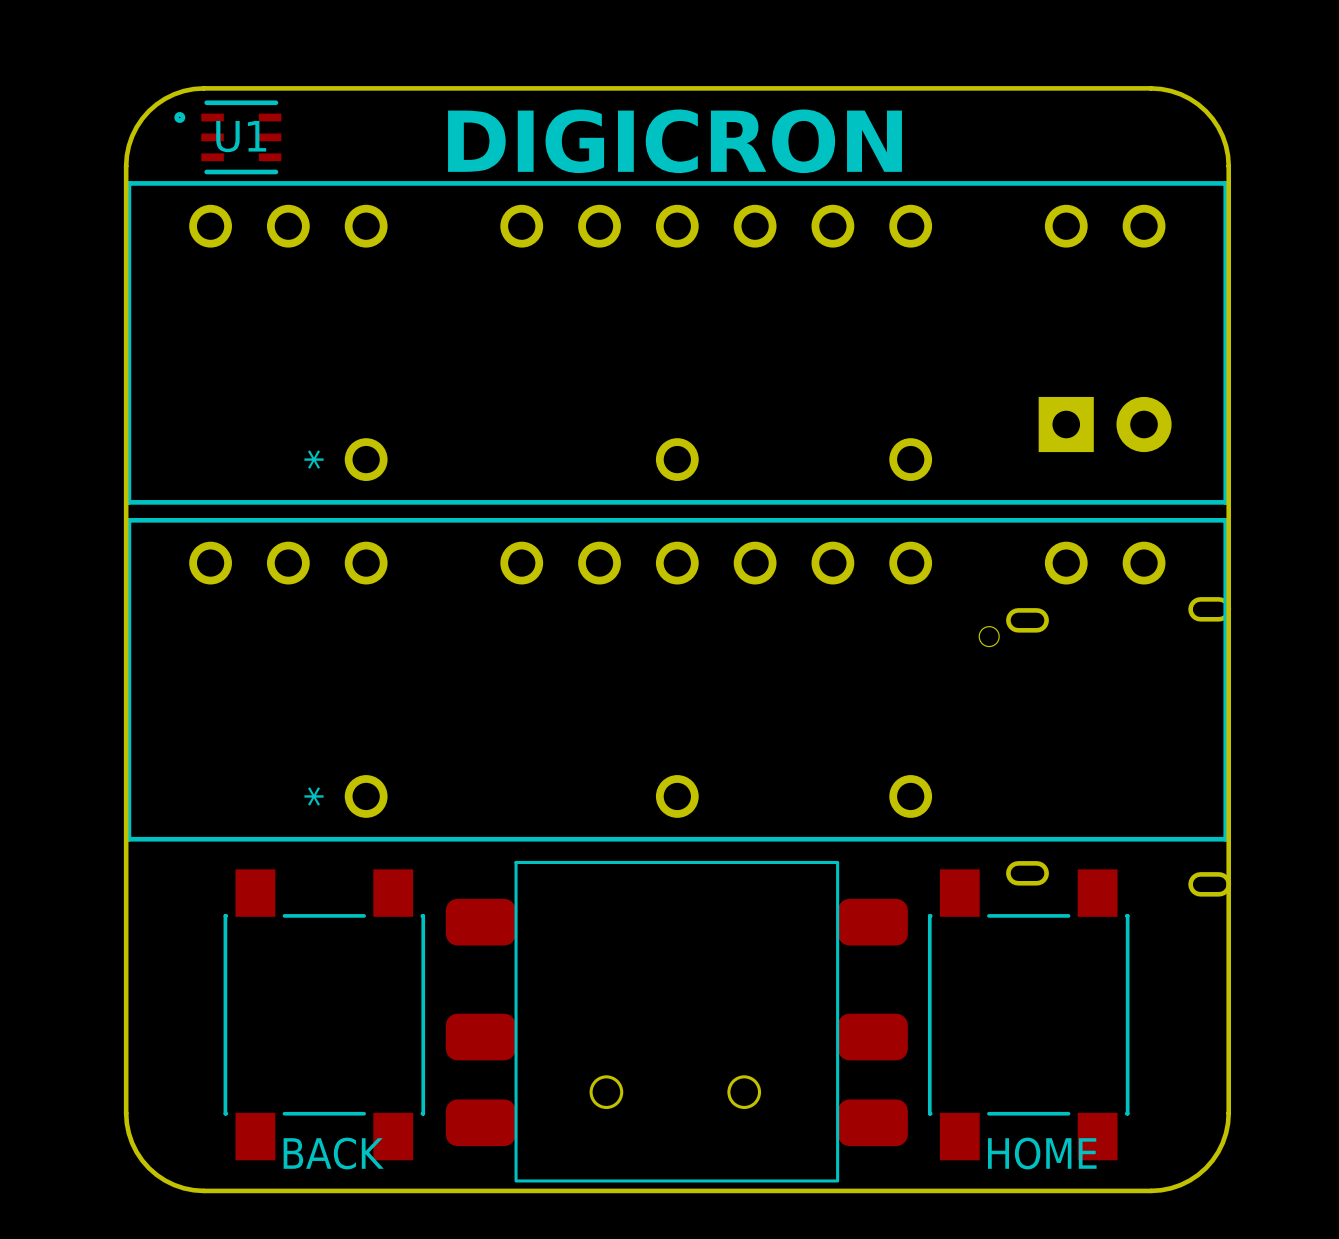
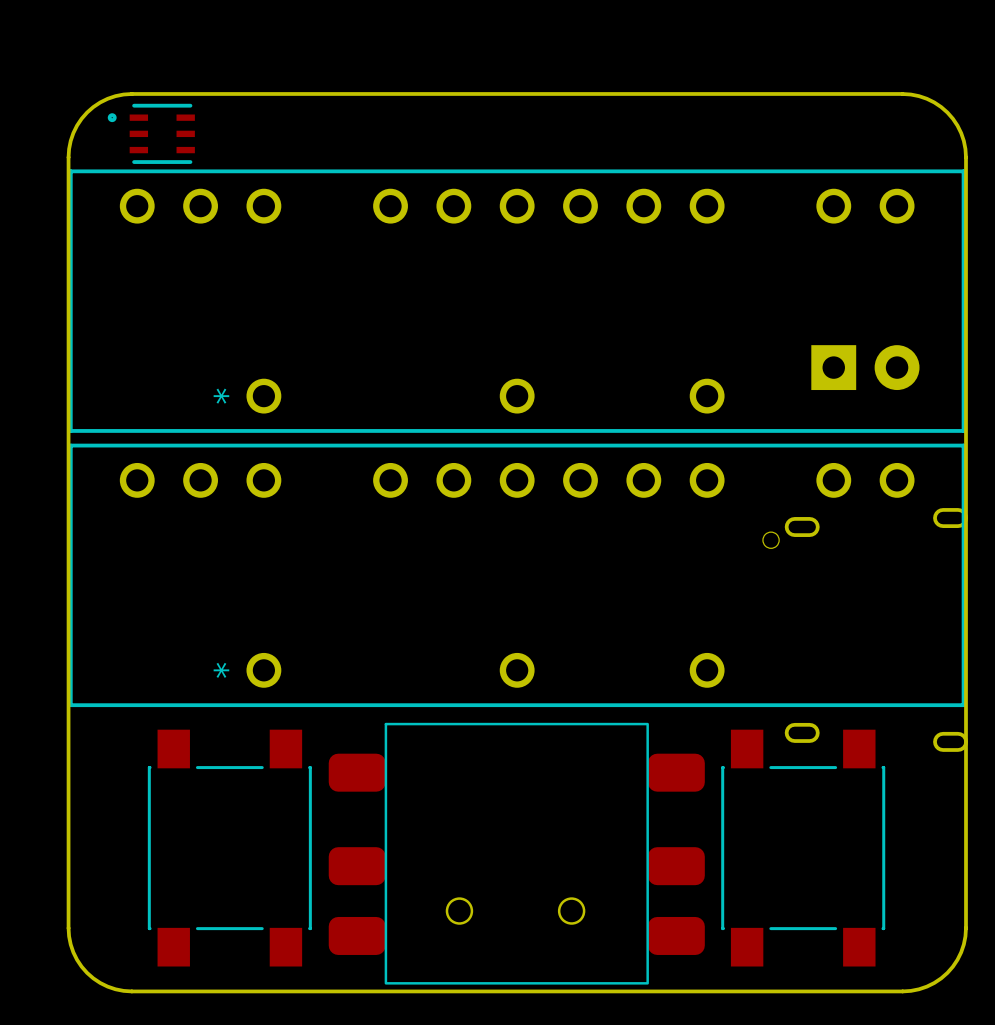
U1 name: U1 (241, 136) -> none
text: DIGICRON (674, 141) -> none
text: BACK (333, 1153) -> none
text: HOME (1042, 1153) -> none

